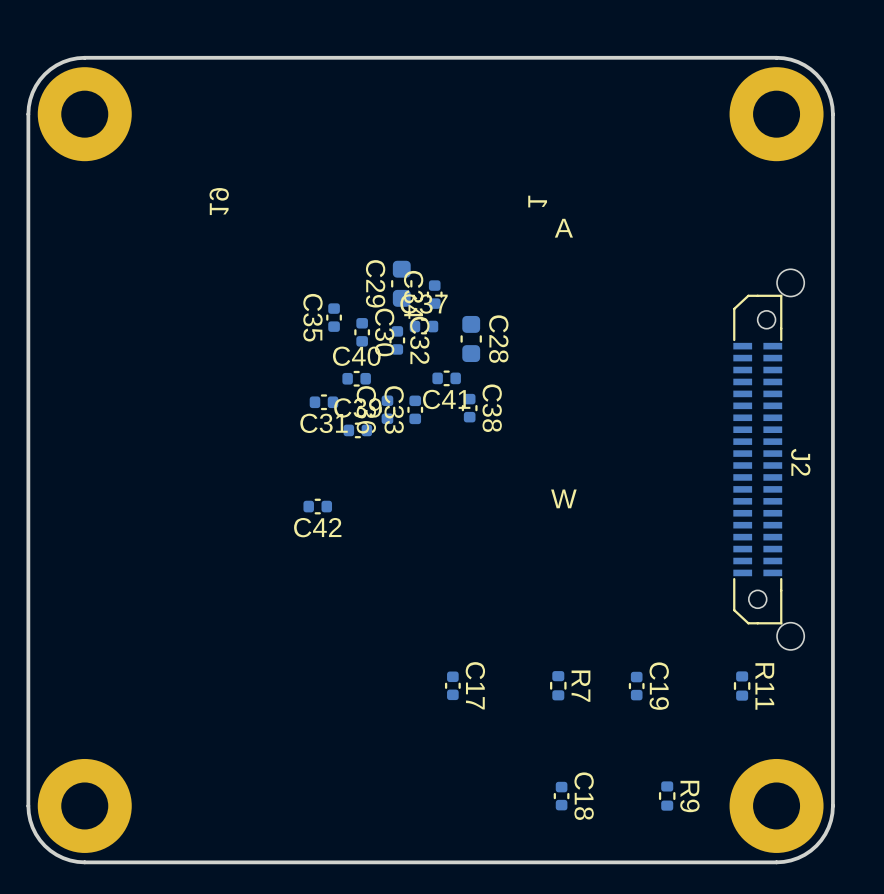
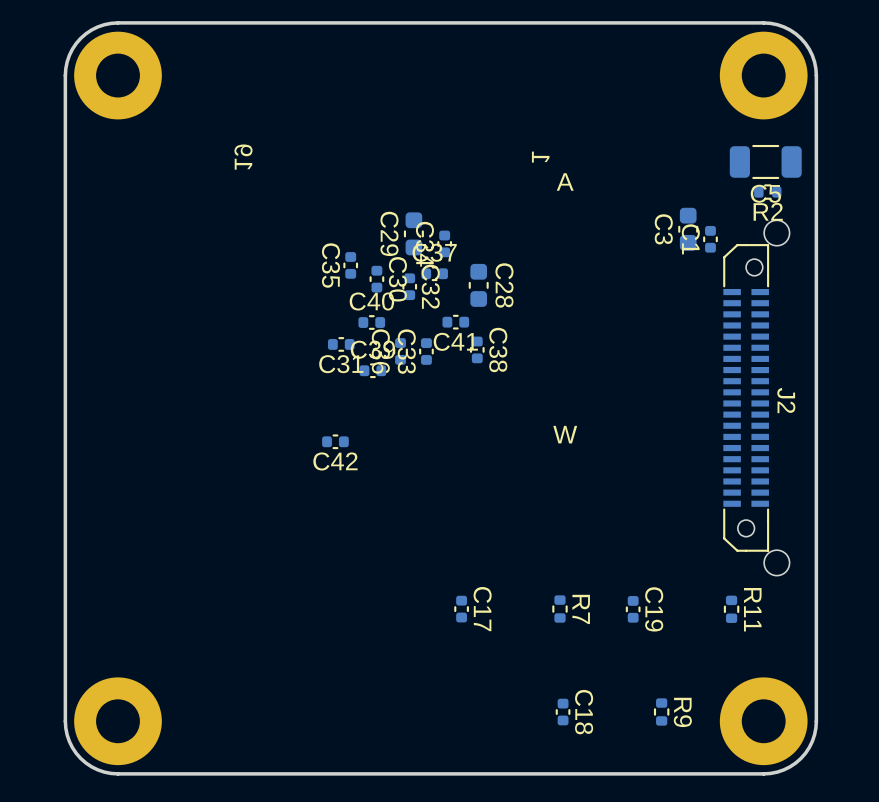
C5: none -> (765, 161)
R2: none -> (767, 192)
C3: none -> (688, 229)
C1: none -> (710, 239)

